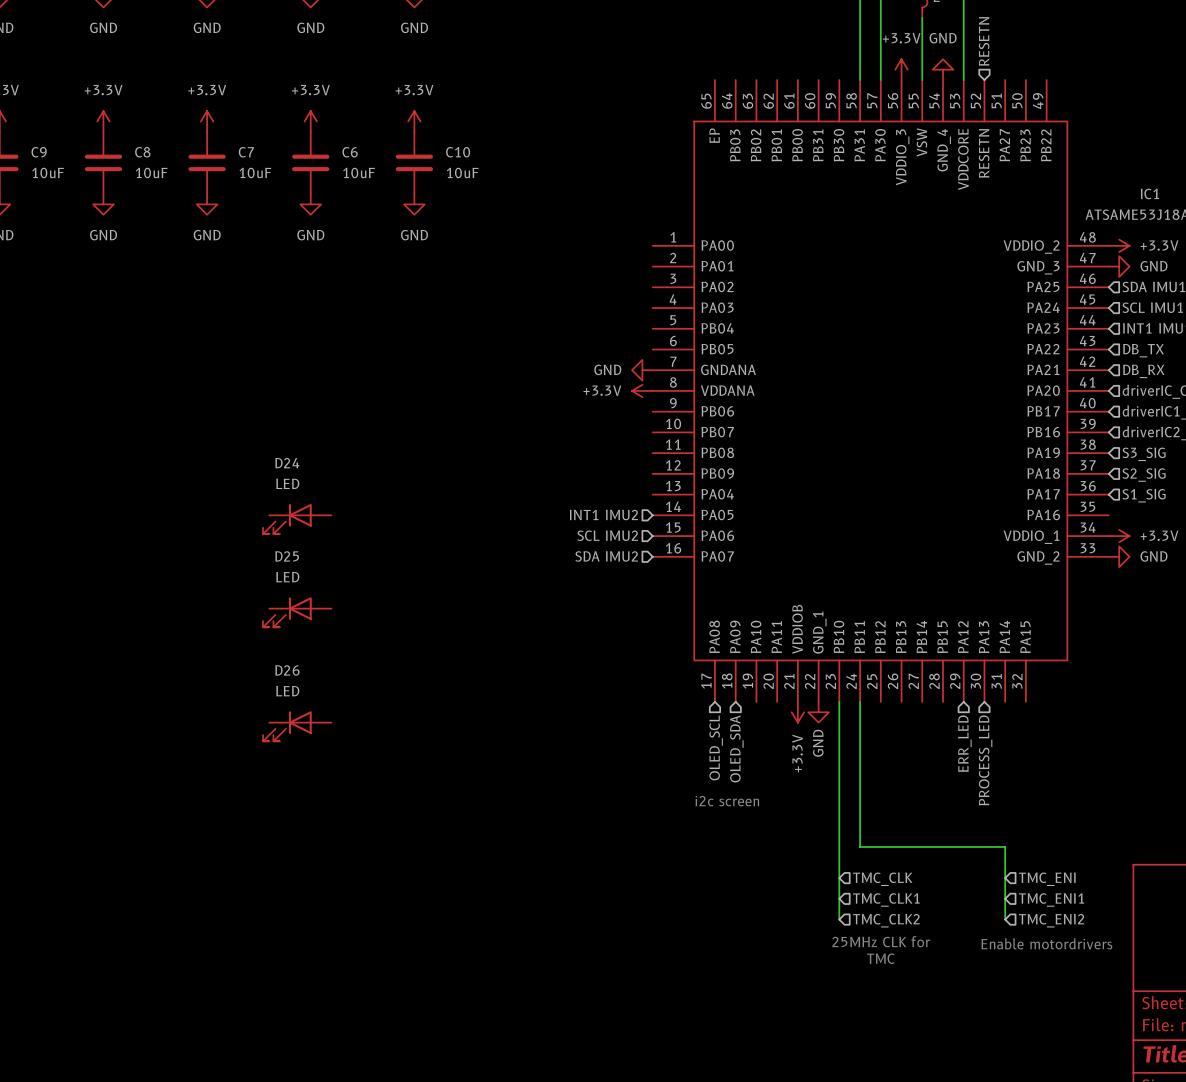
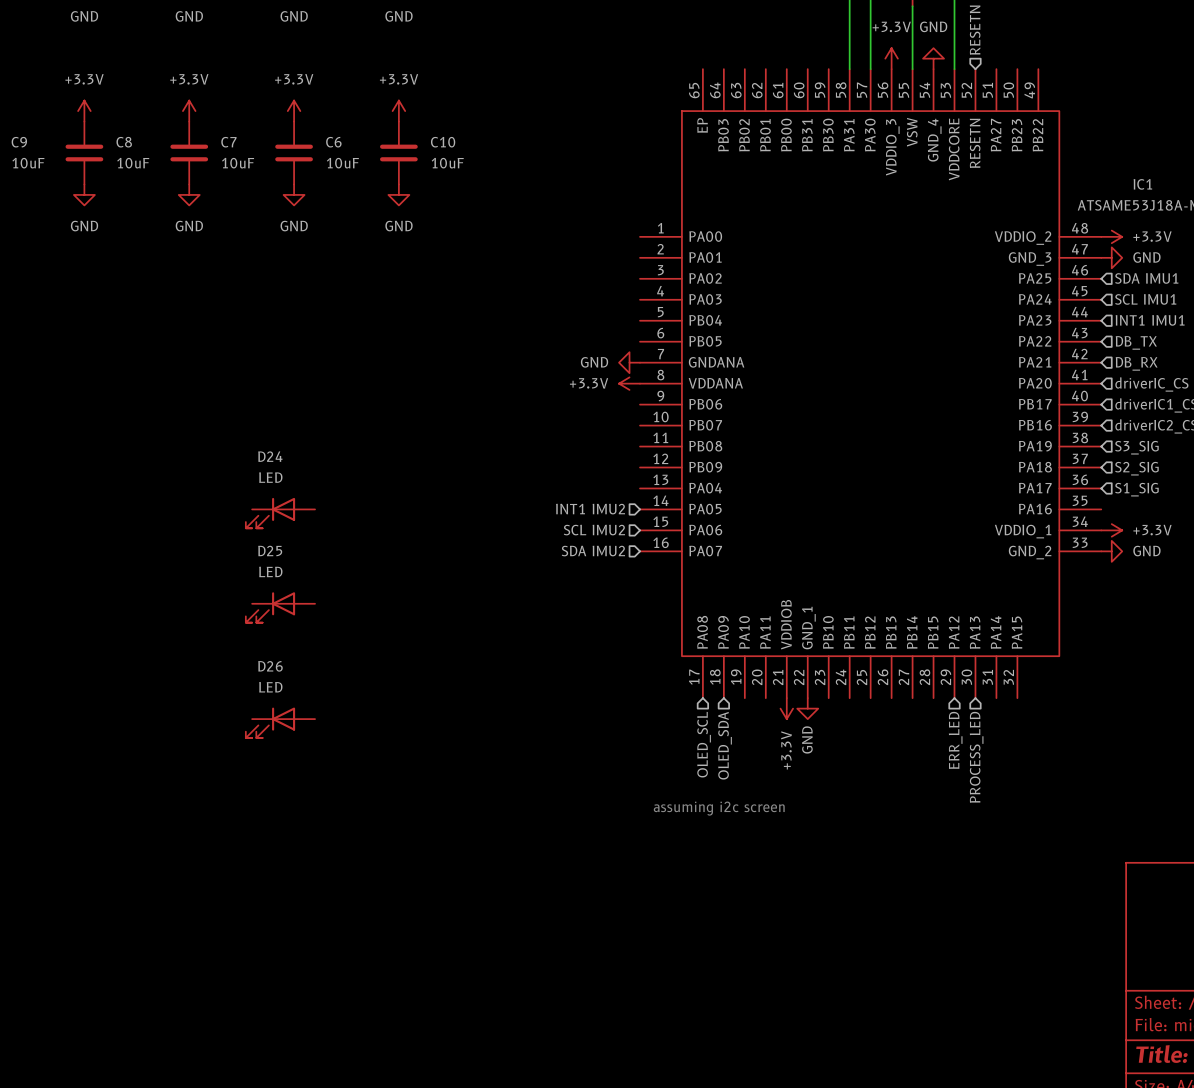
wire: (839, 701) (839, 919) -> none
wire: (860, 701) (860, 847) (1005, 847) (1005, 919) -> none
text: i2c screen (727, 801) -> assuming i2c screen (719, 808)
hierarchical label: TMC_CLK (882, 879) -> none
hierarchical label: TMC_ENI (1047, 879) -> none
hierarchical label: TMC_CLK1 (886, 900) -> none
hierarchical label: TMC_ENI1 (1051, 900) -> none
hierarchical label: TMC_CLK2 (886, 920) -> none
hierarchical label: TMC_ENI2 (1051, 920) -> none
text: 25MHz CLK for (881, 941) -> none
text: Enable motordrivers (1046, 943) -> none
text: TMC (880, 958) -> none

